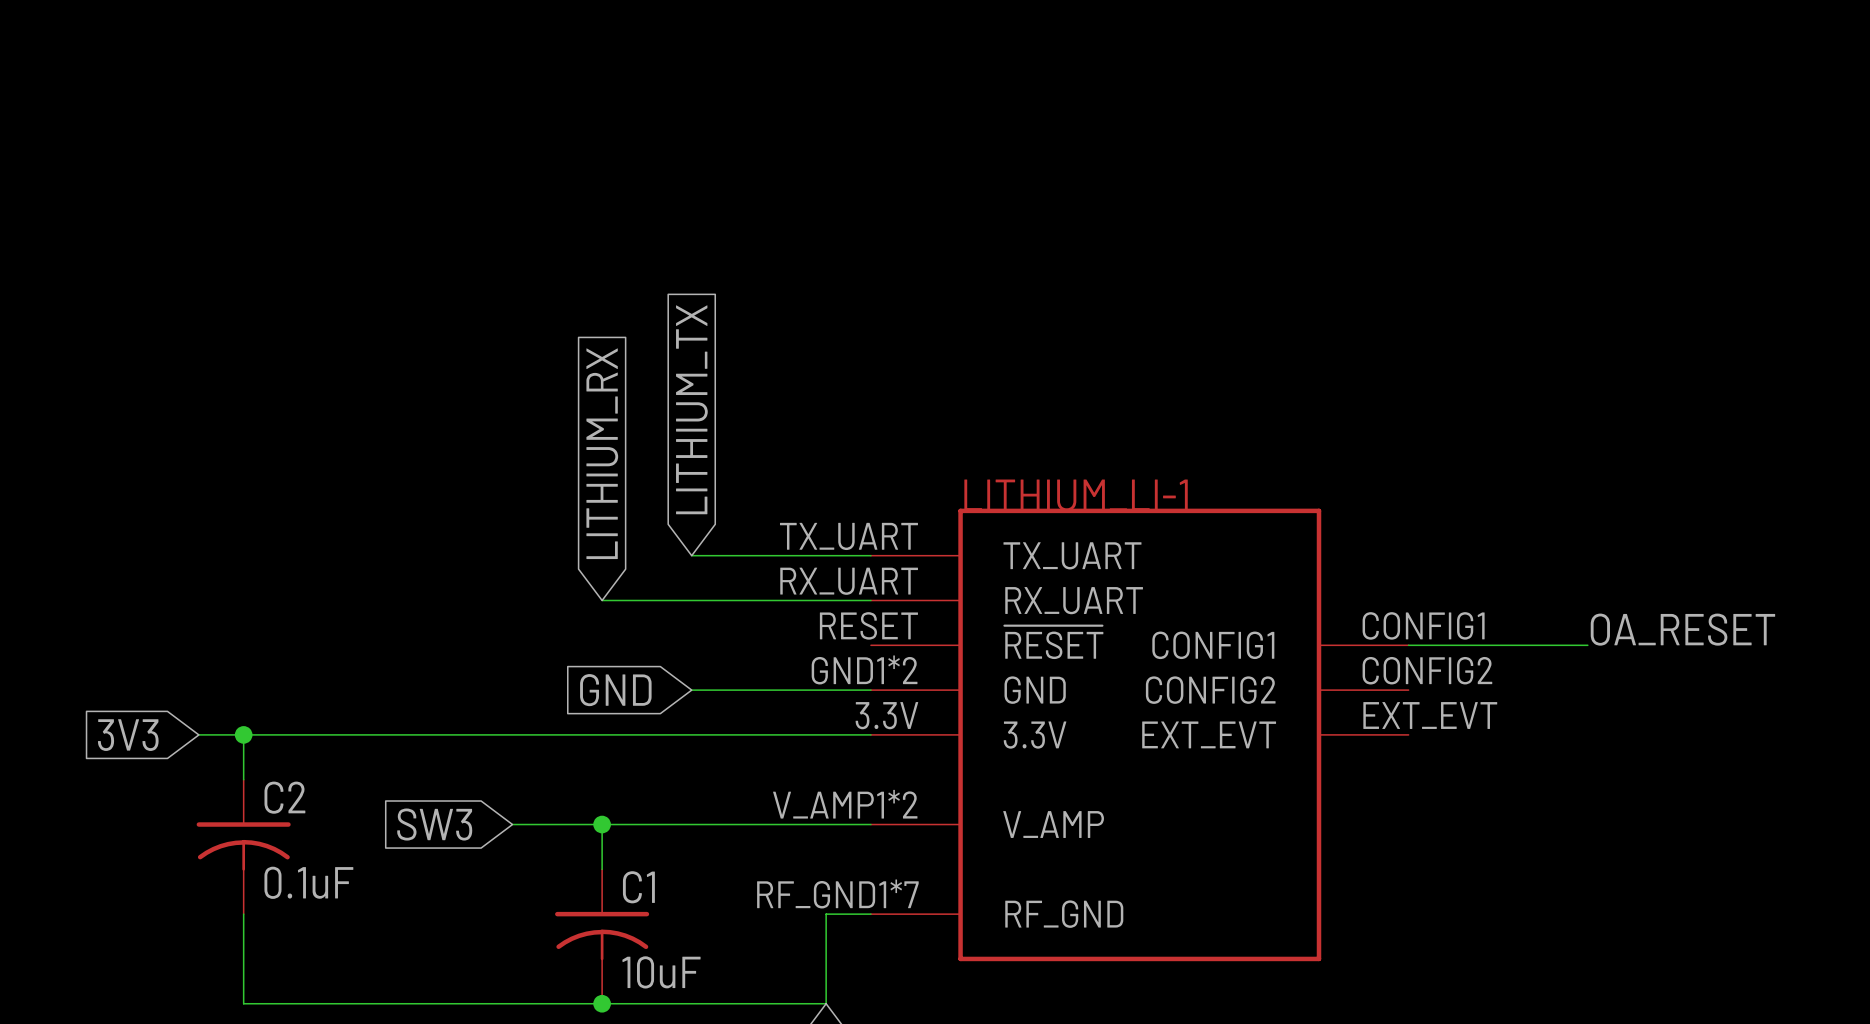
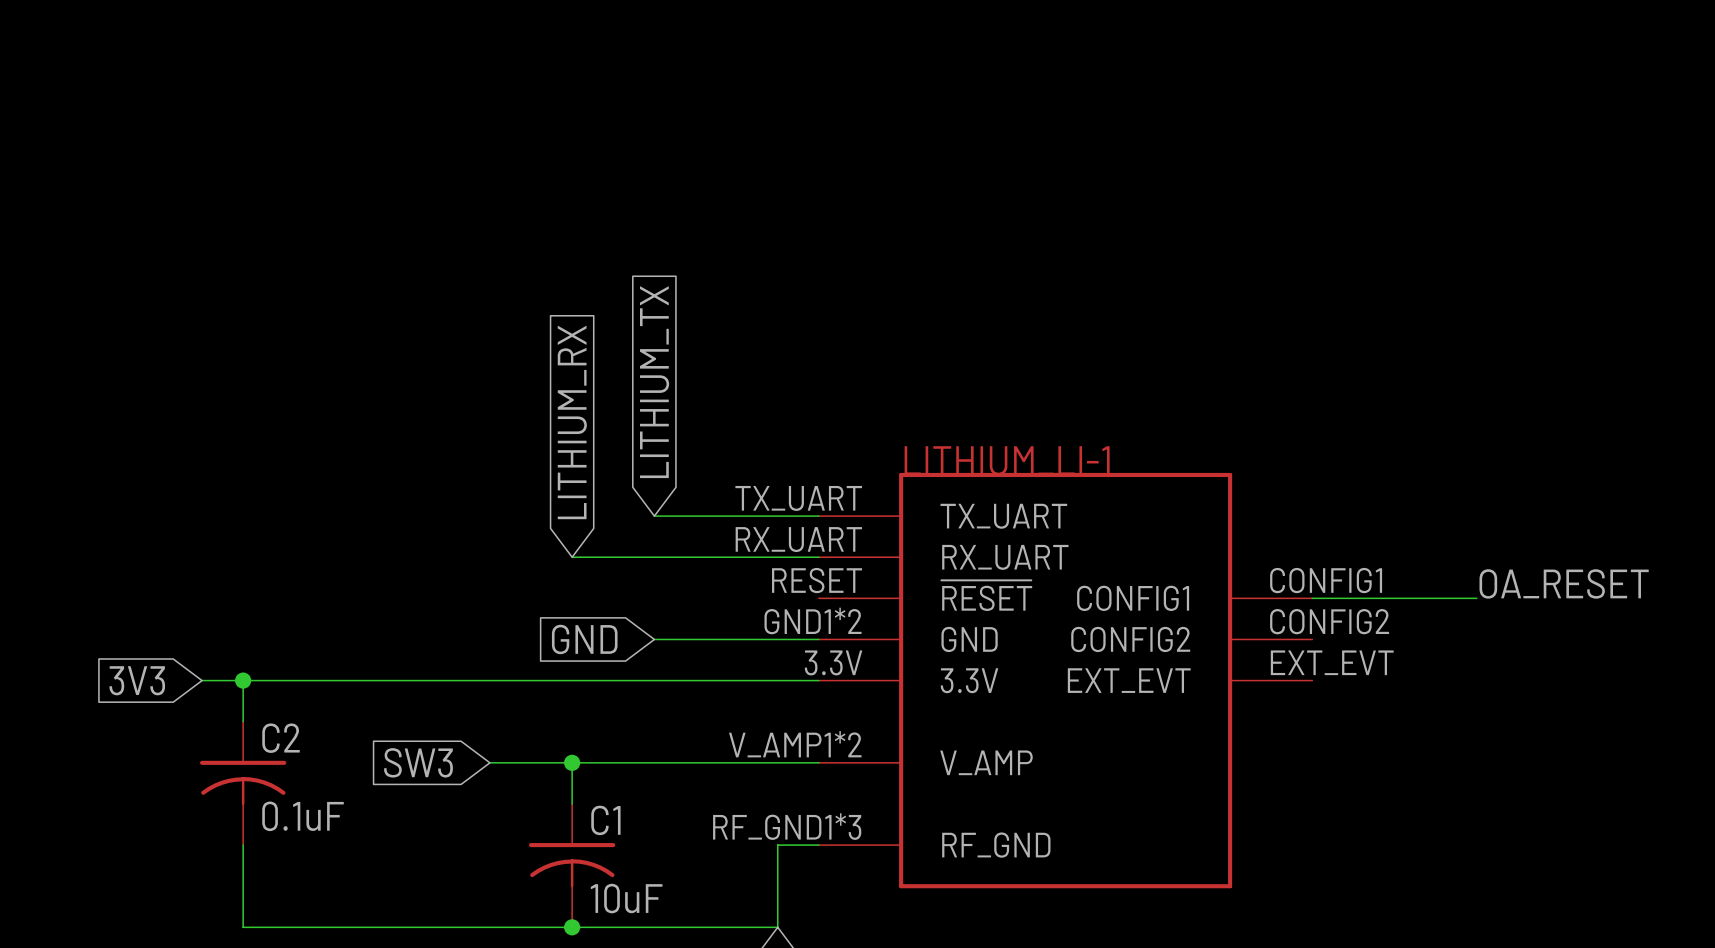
part pin number: RF_GND1*7 (837, 893) -> RF_GND1*3 (787, 826)

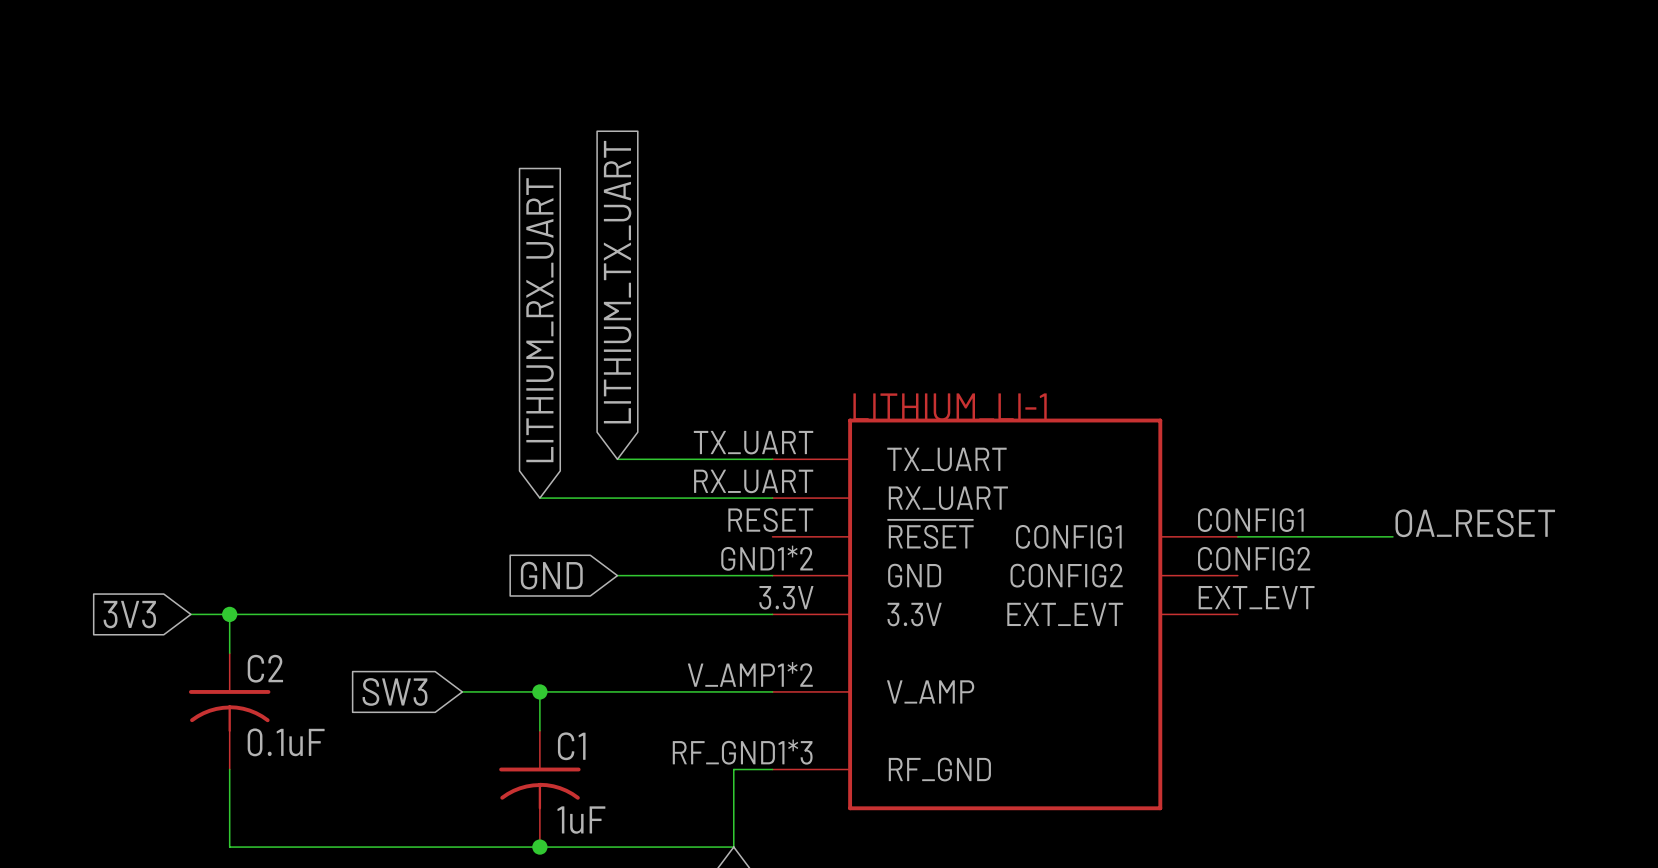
global label: LITHIUM_TX (654, 382) -> LITHIUM_TX_UART (617, 282)
global label: LITHIUM_RX (572, 422) -> LITHIUM_RX_UART (540, 320)
C1 value: 10uF (626, 898) -> 1uF (581, 820)

